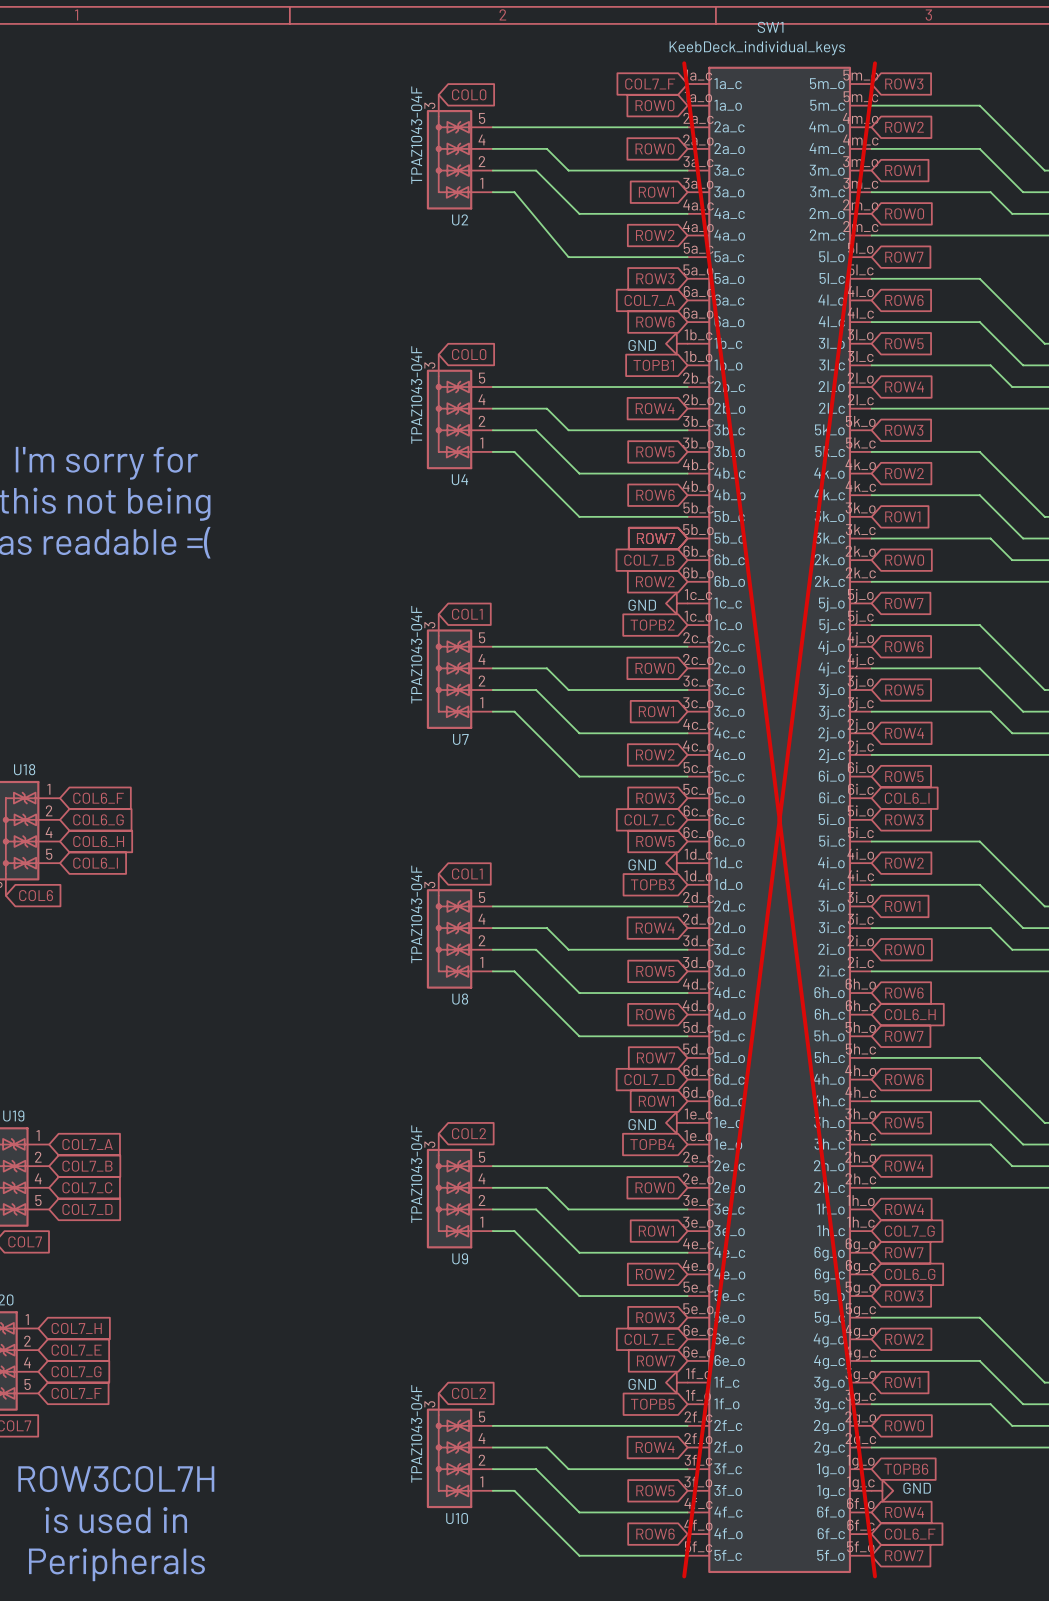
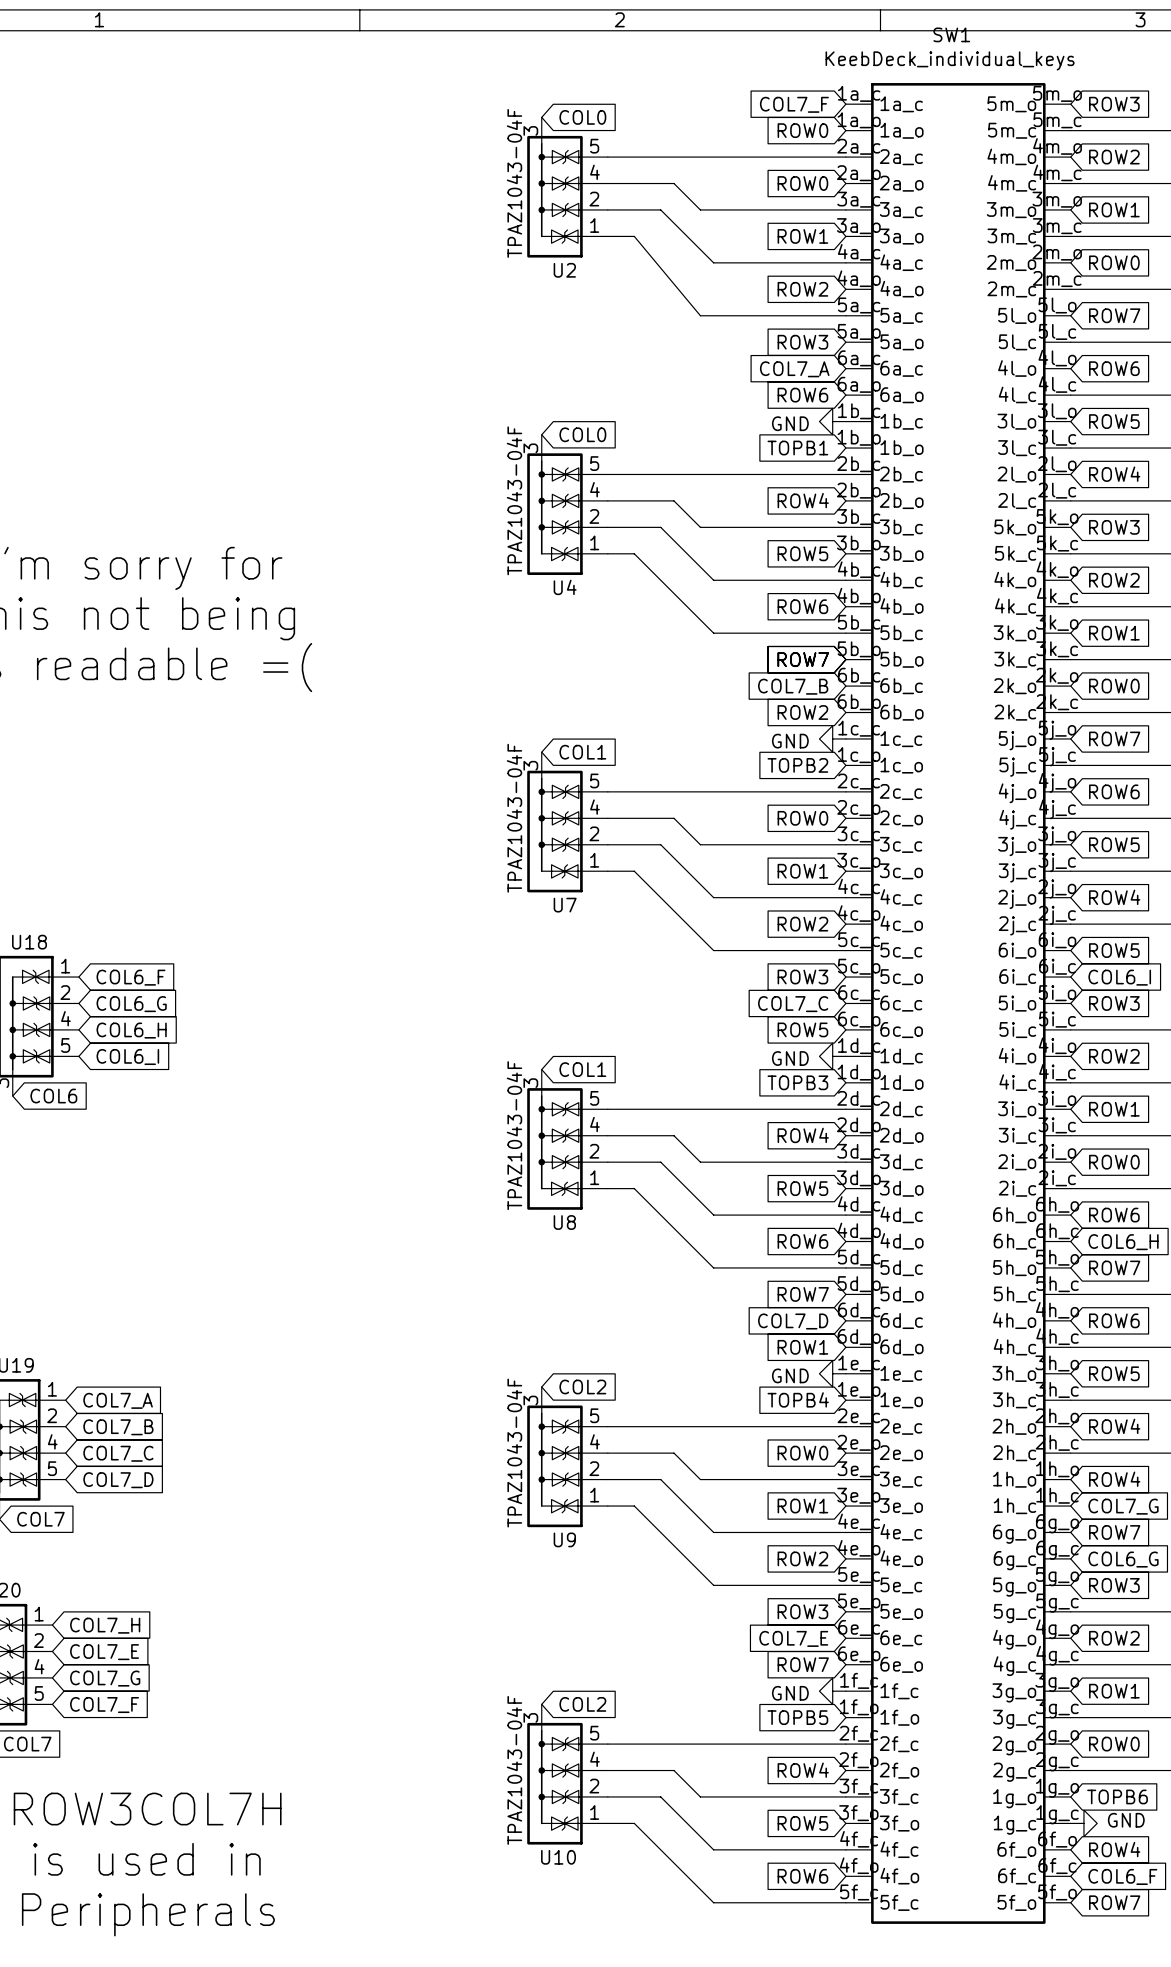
SW1 do-not-place cross: (779, 819) -> none

